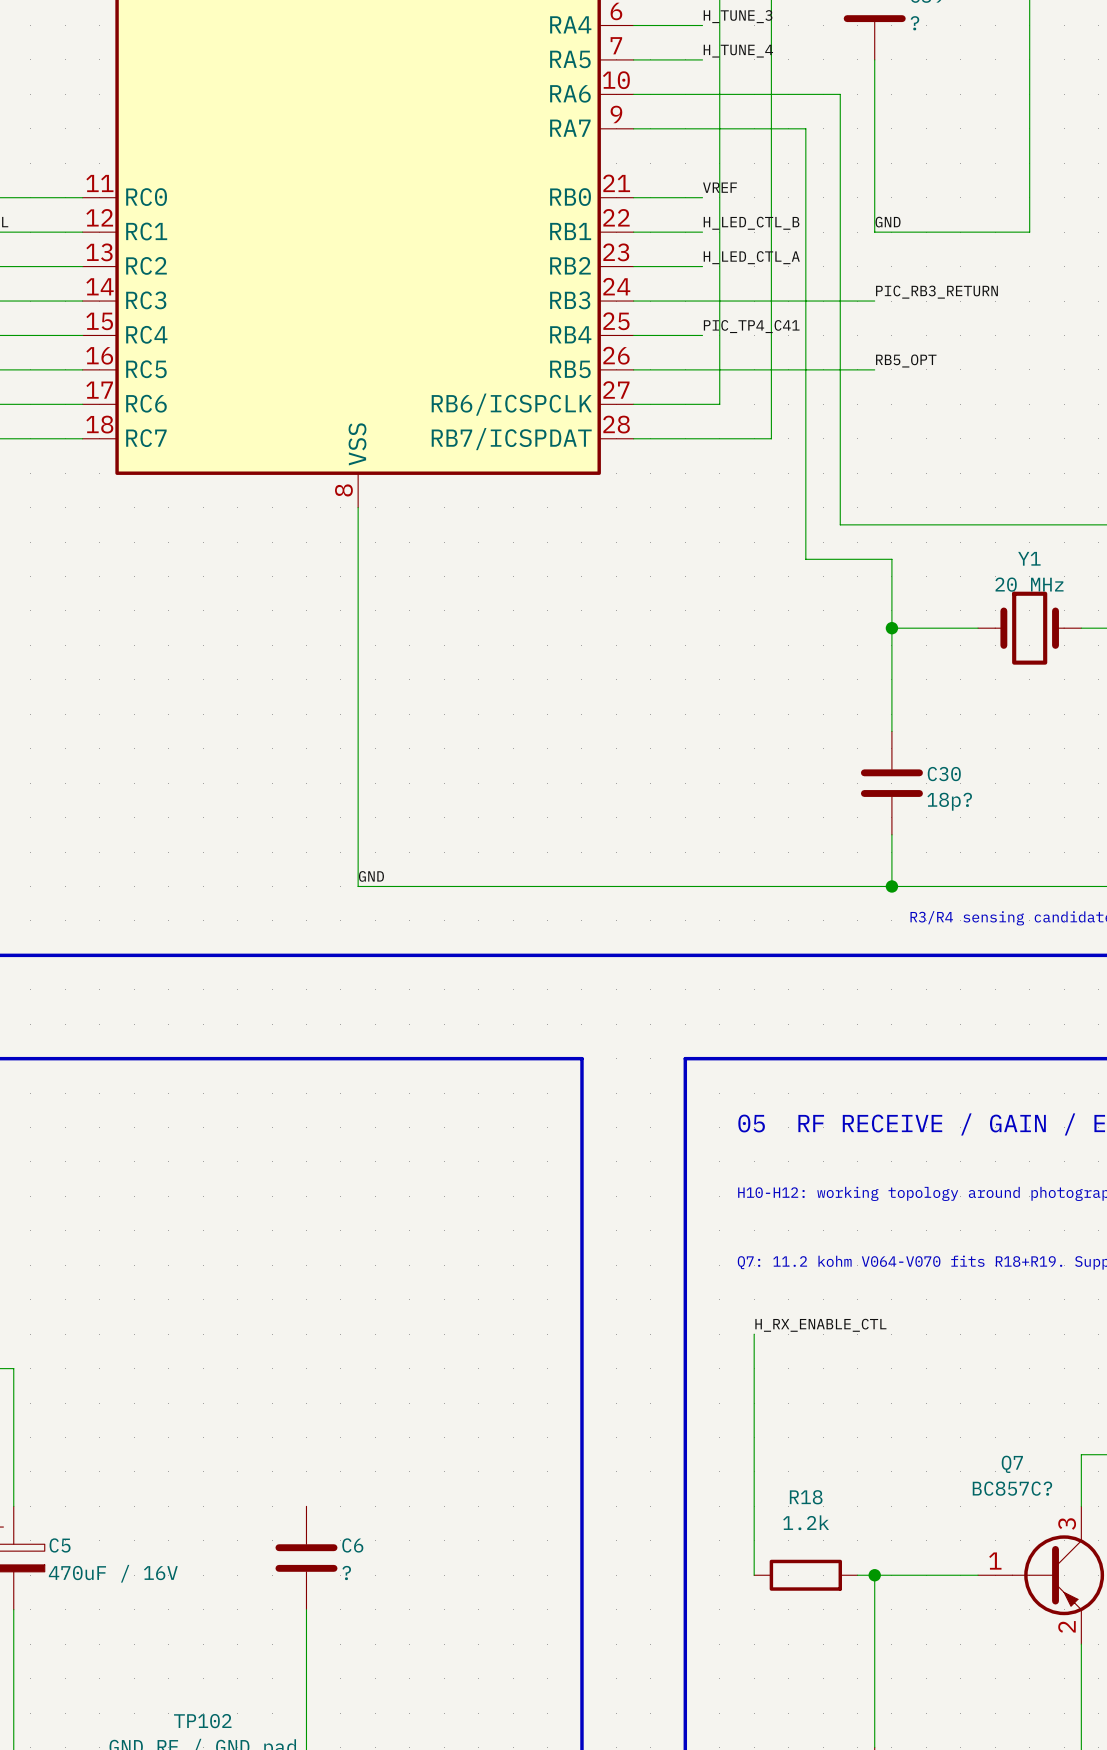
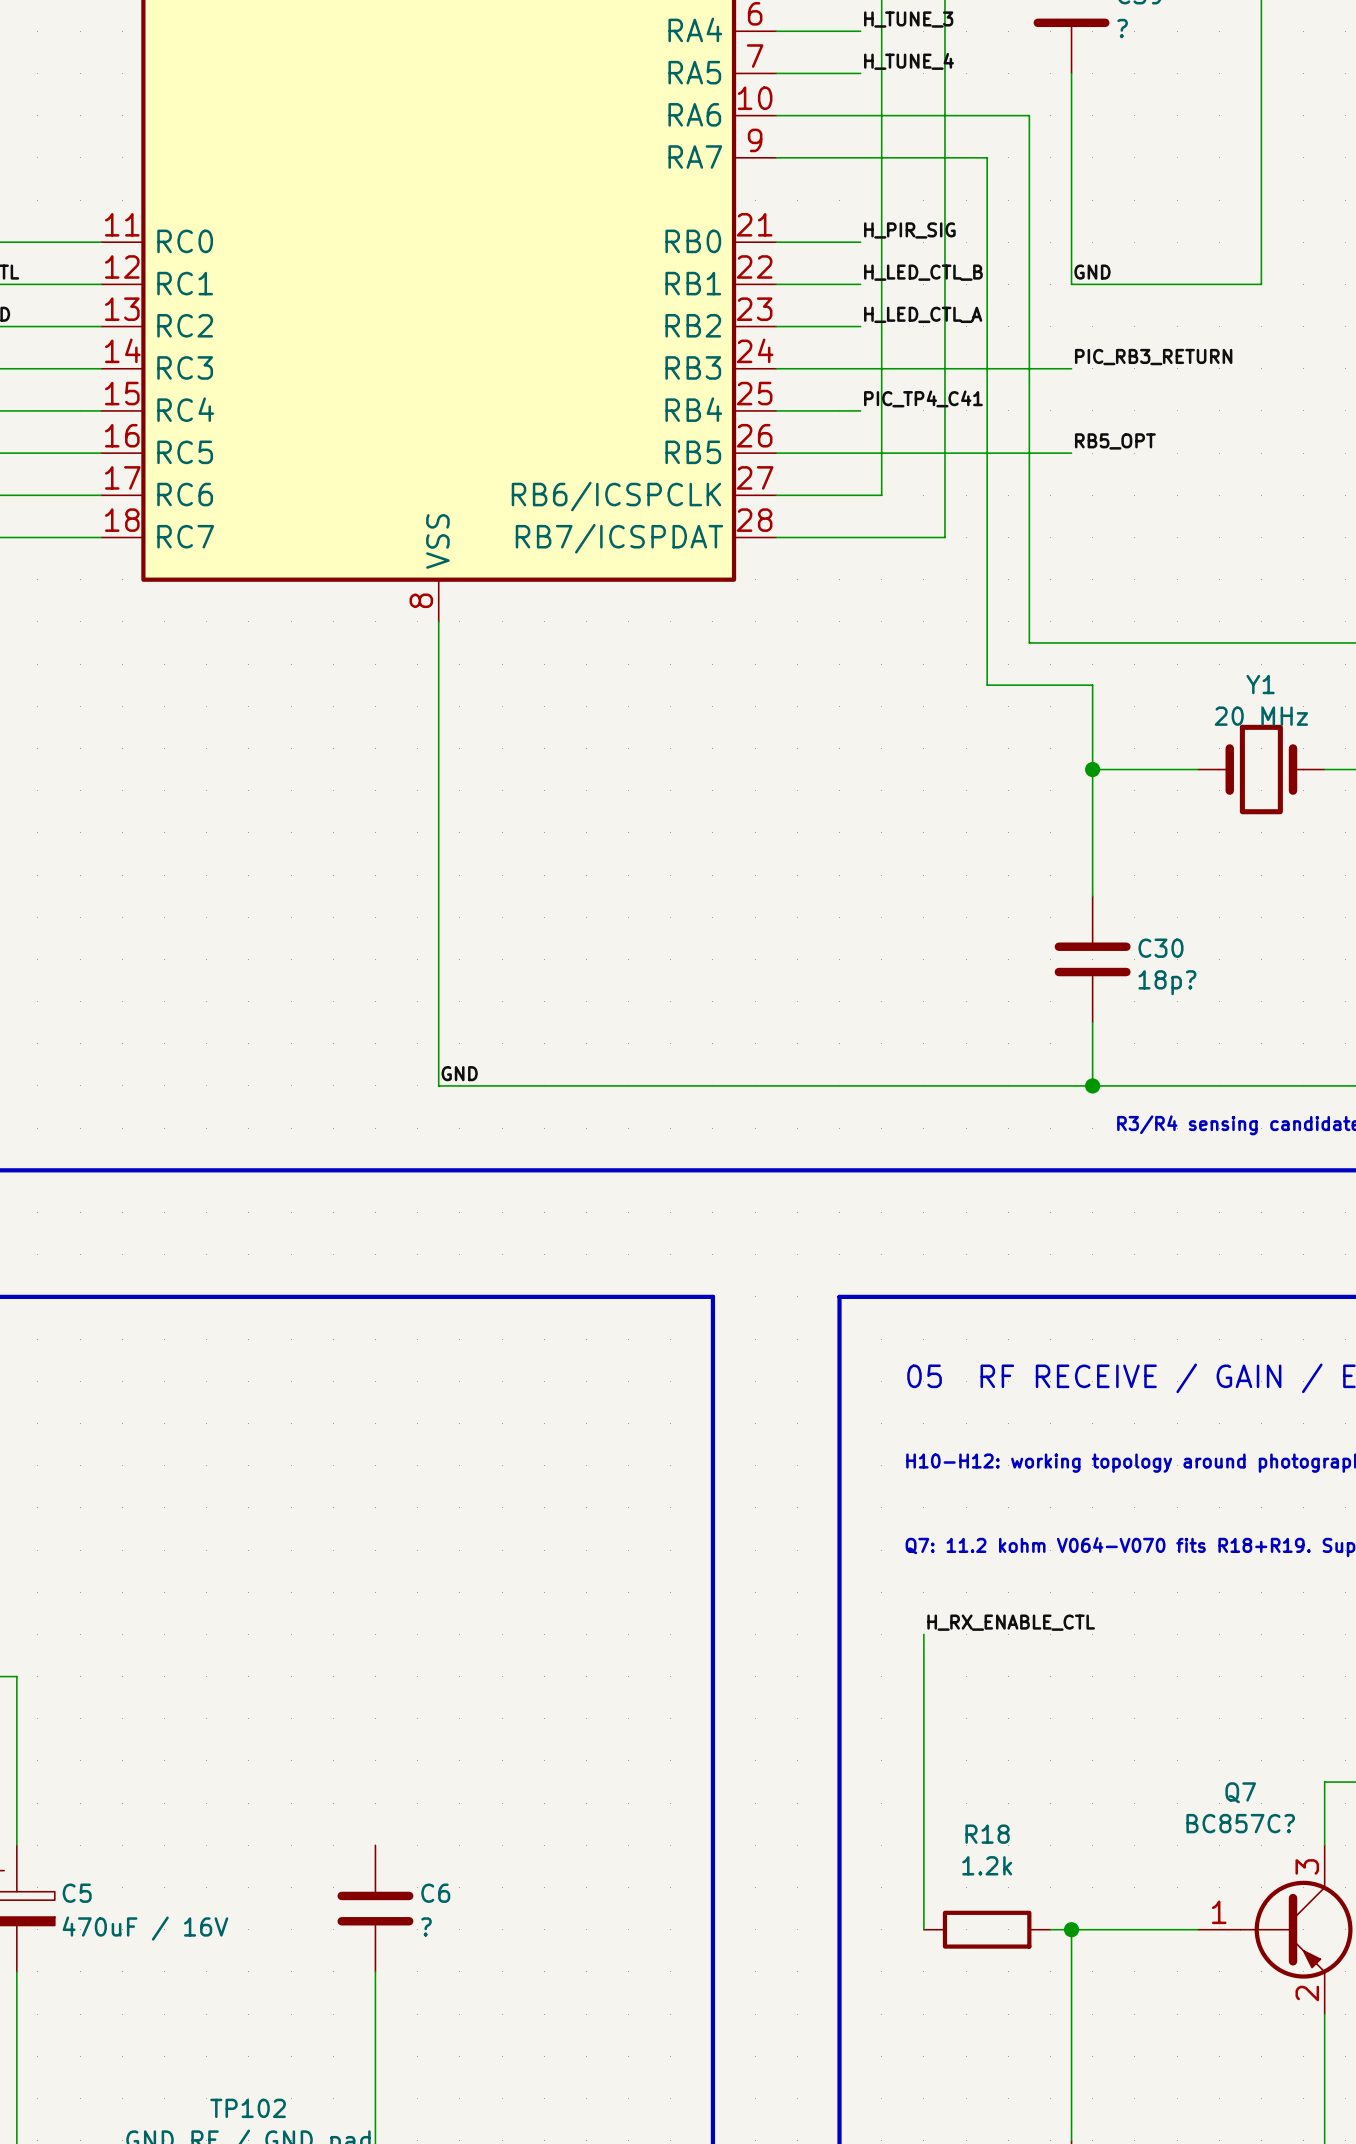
label: VREF (720, 187) -> H_PIR_SIG (909, 230)

